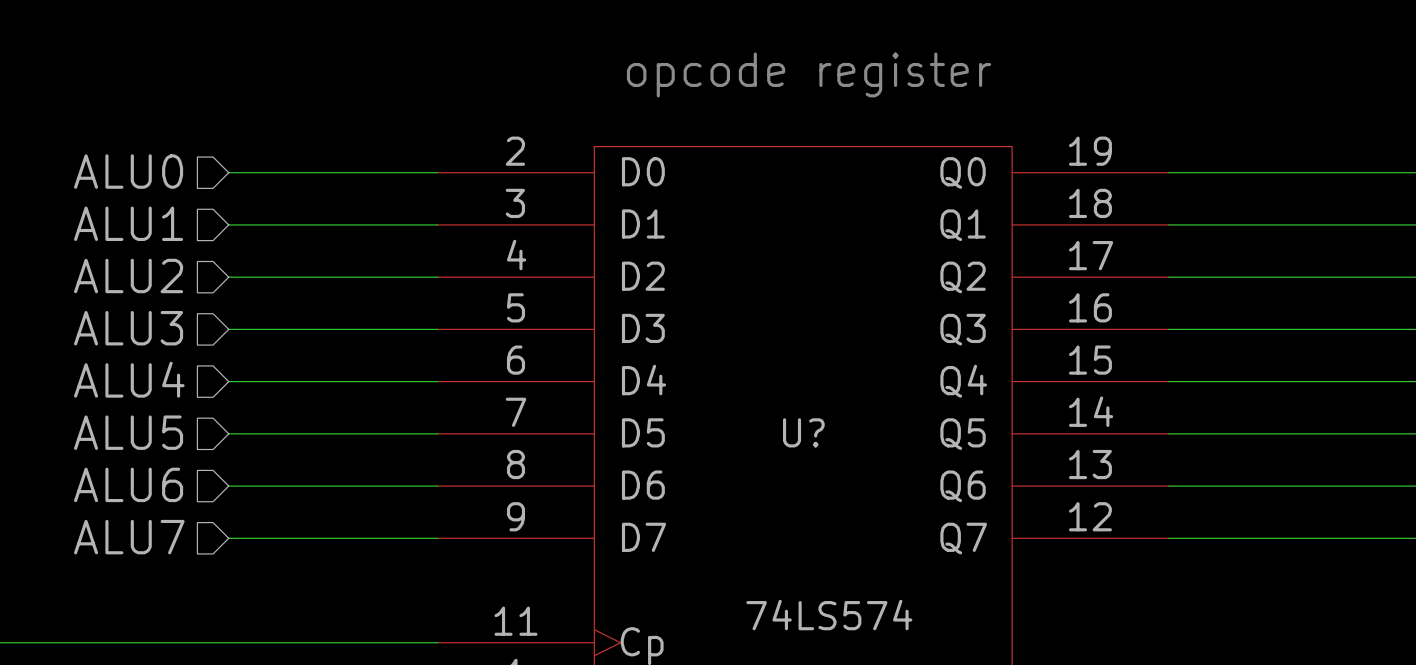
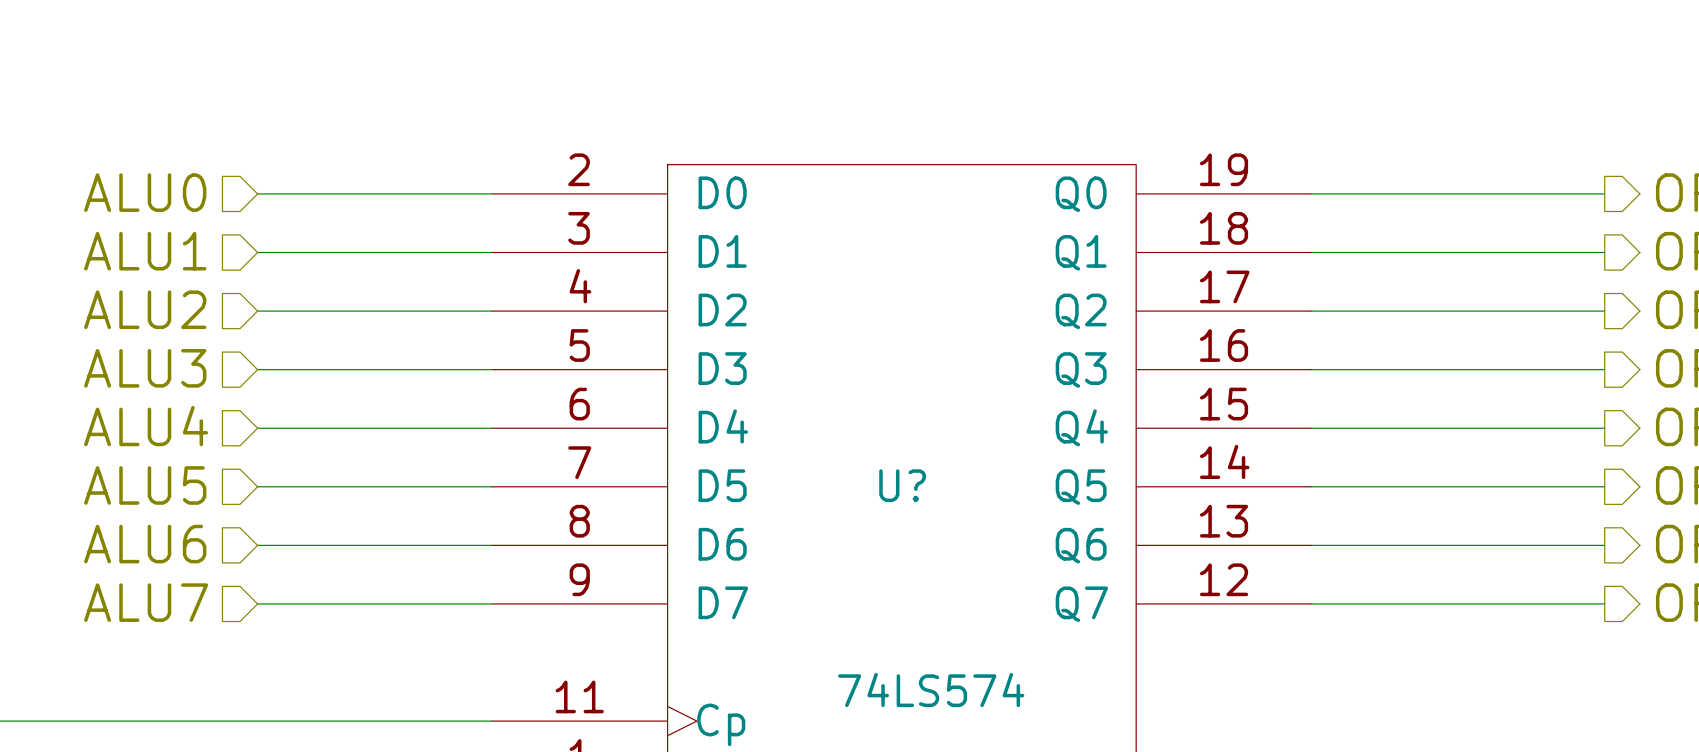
text: opcode register (809, 74) -> none

